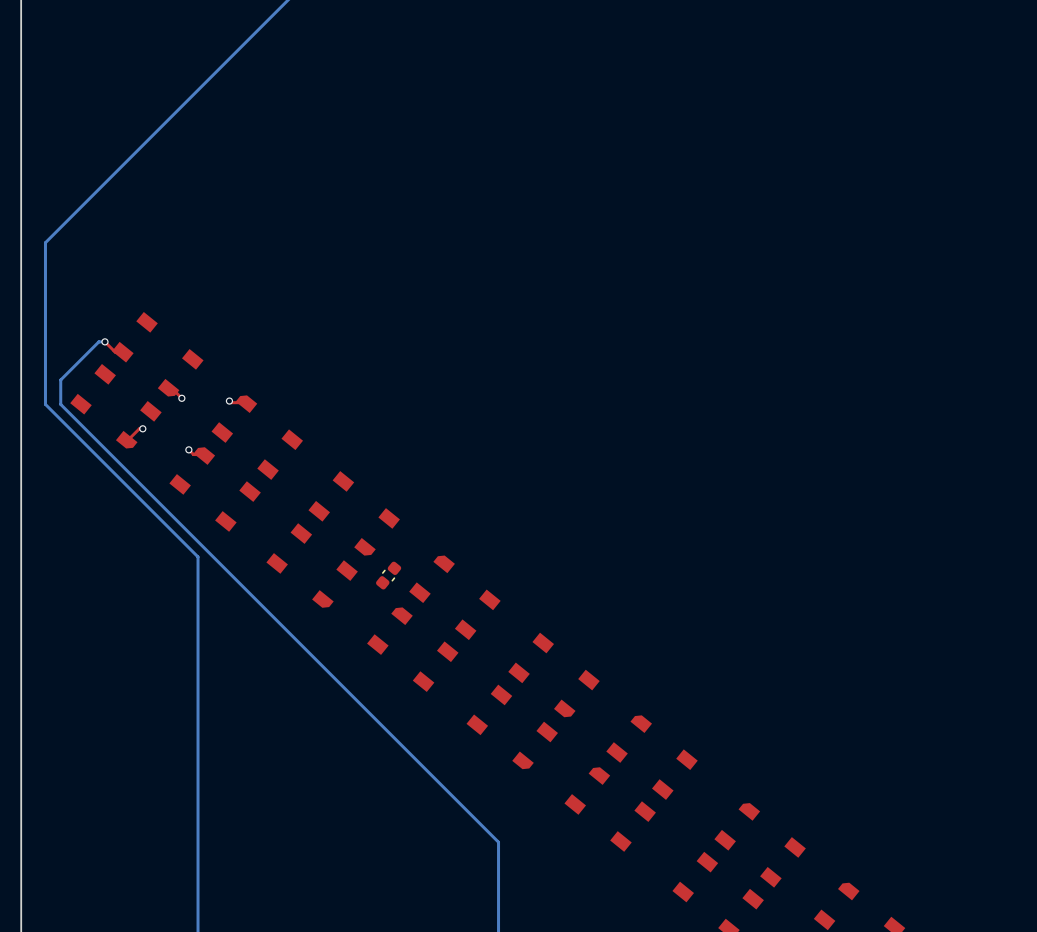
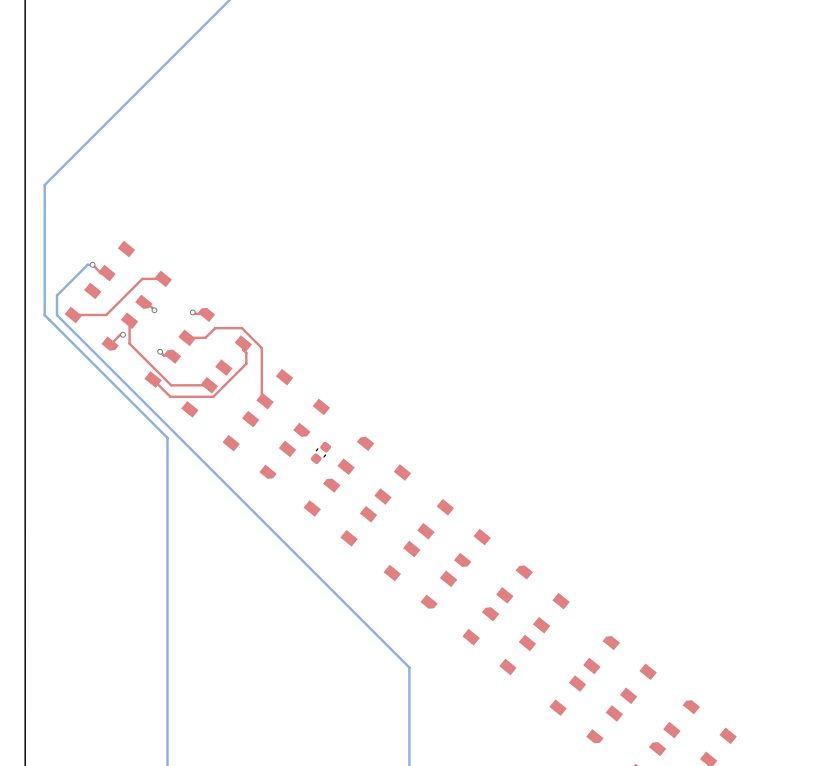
top track: none -> (163, 278) (142, 278) (106, 314) (73, 314)
top track: none -> (129, 320) (129, 343) (171, 385) (209, 385)
top track: none -> (187, 337) (205, 337) (215, 328) (241, 328) (261, 348) (261, 397) (265, 401)
top track: none -> (243, 343) (243, 349) (246, 352) (246, 363) (213, 396) (170, 396) (153, 379)

